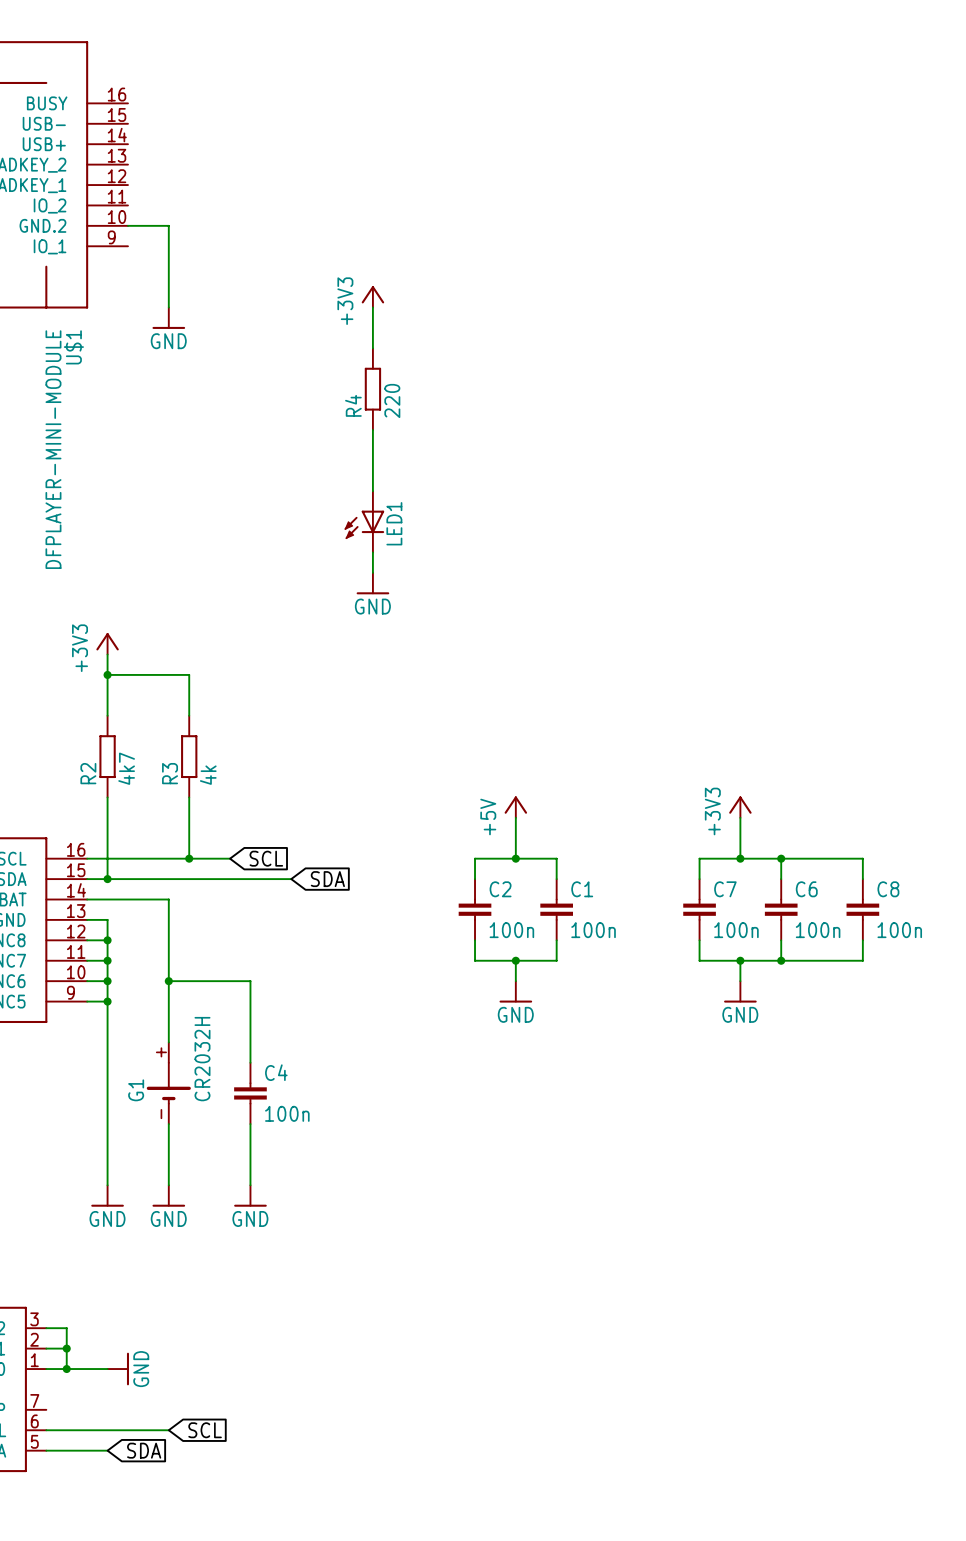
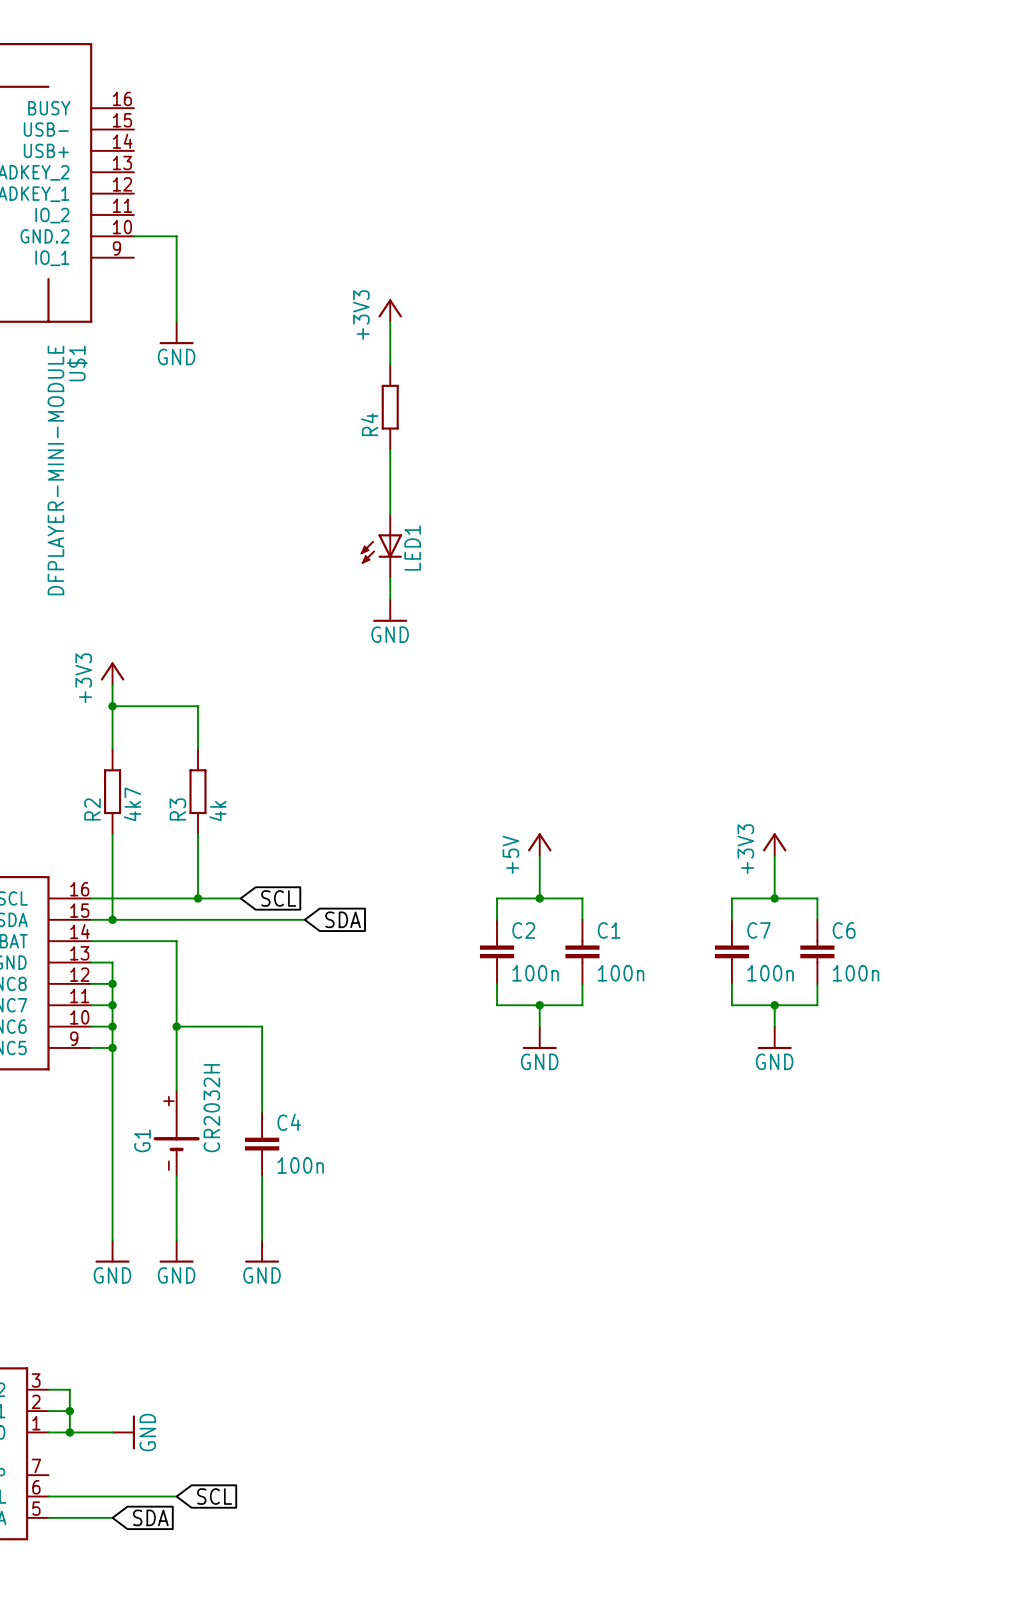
R4 value: 220 (392, 400) -> none
wire: (781, 858) (862, 858) (862, 879) -> none
junction: (781, 858) -> none
C8: 100n (862, 909) -> none
wire: (862, 940) (862, 960) (781, 960) -> none
junction: (781, 960) -> none

